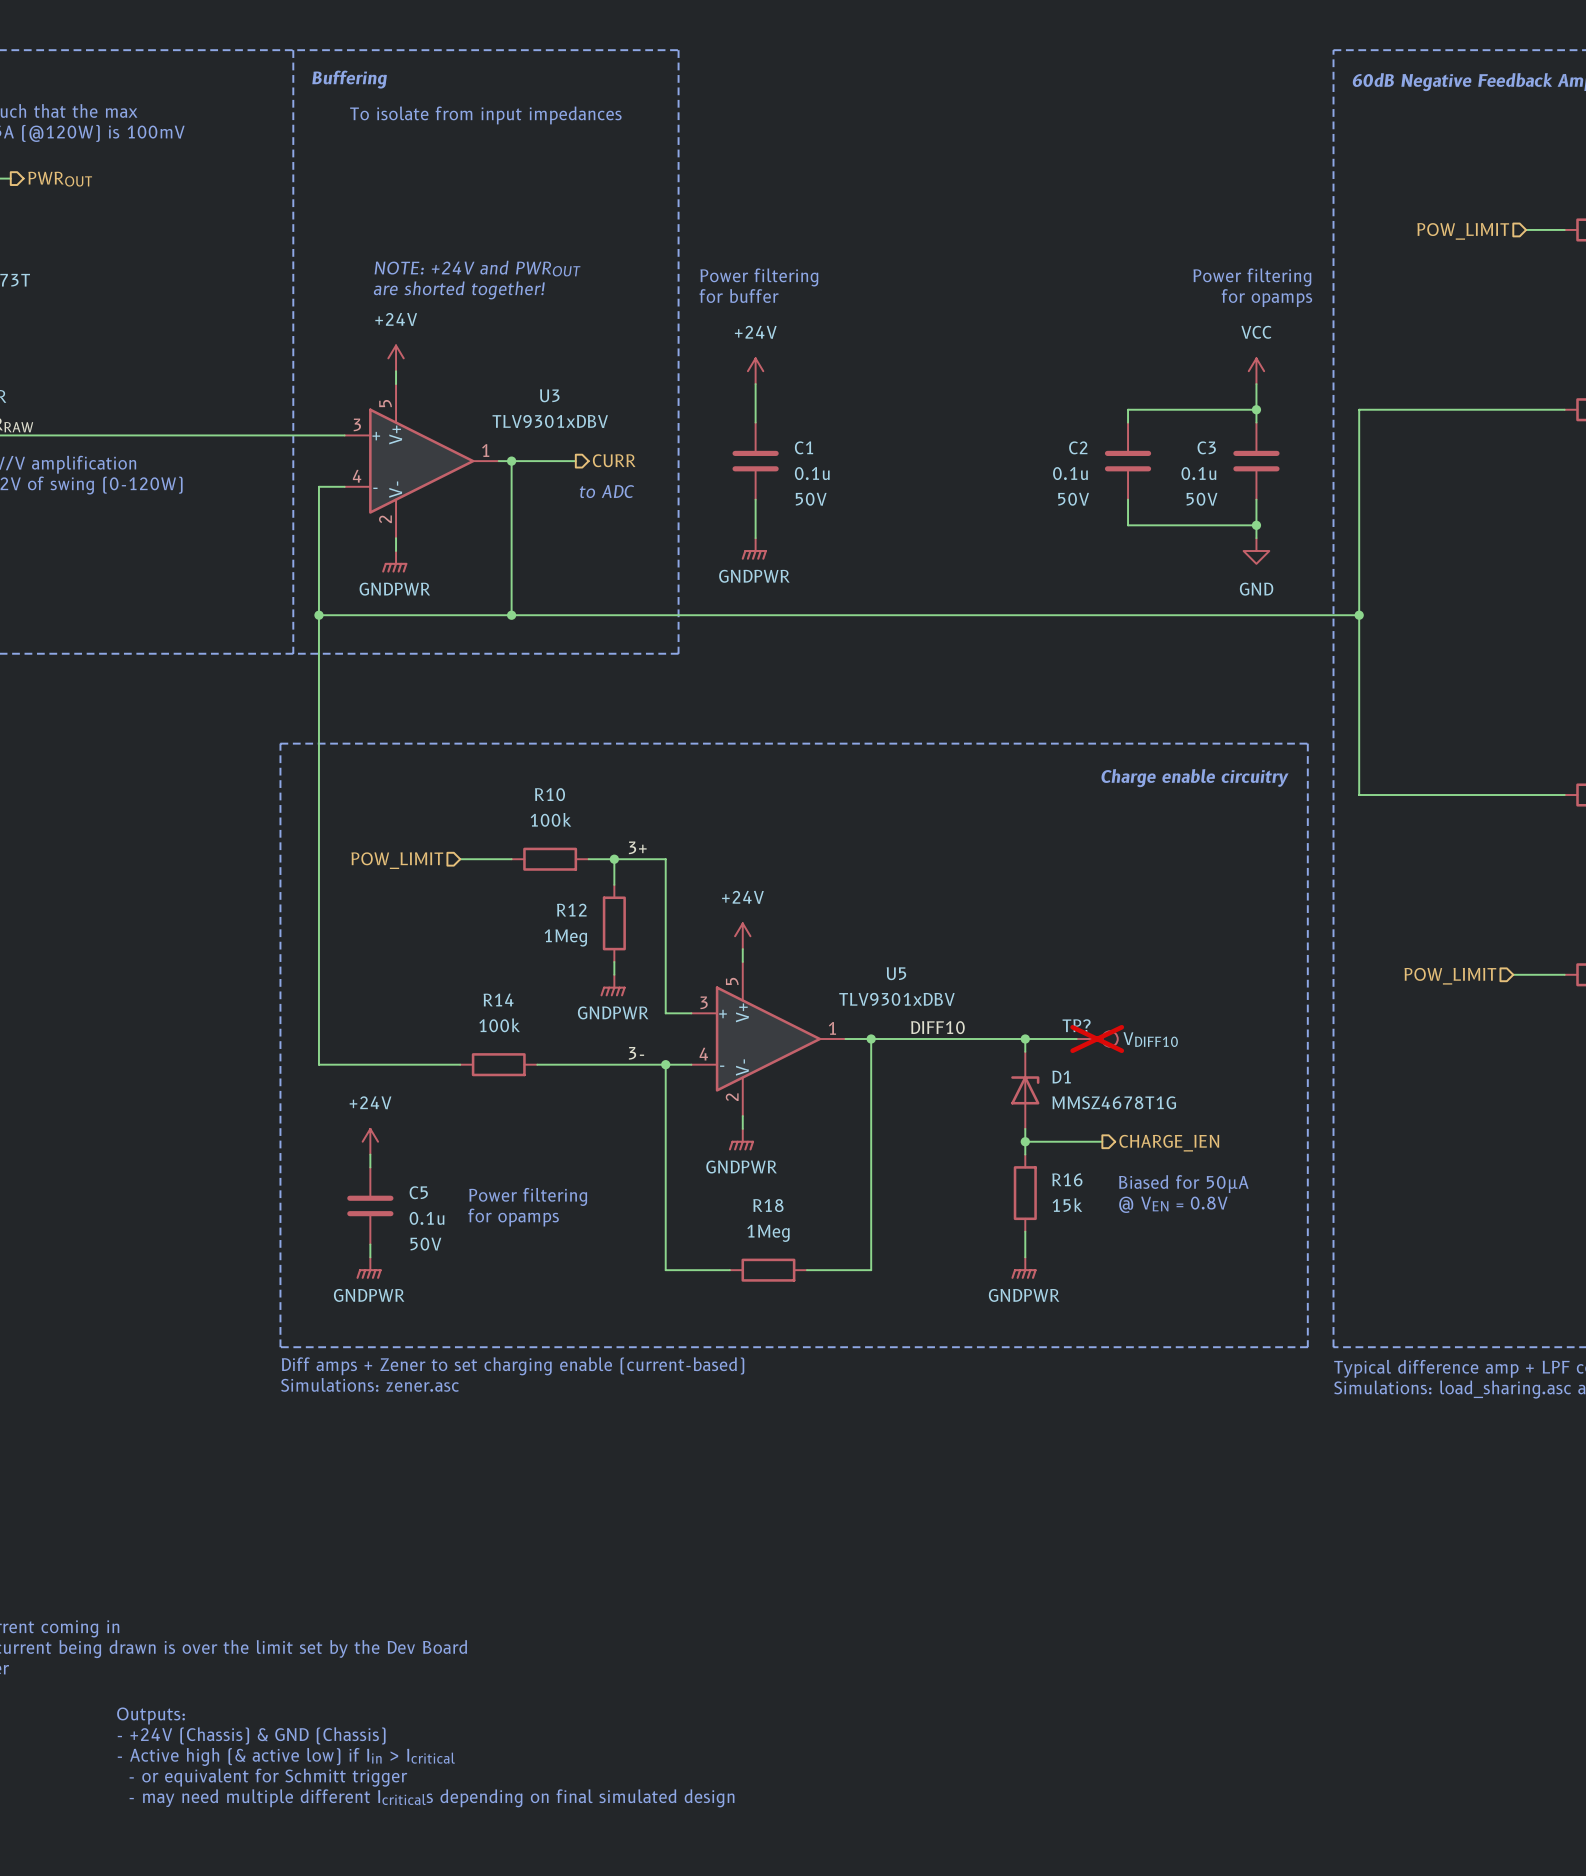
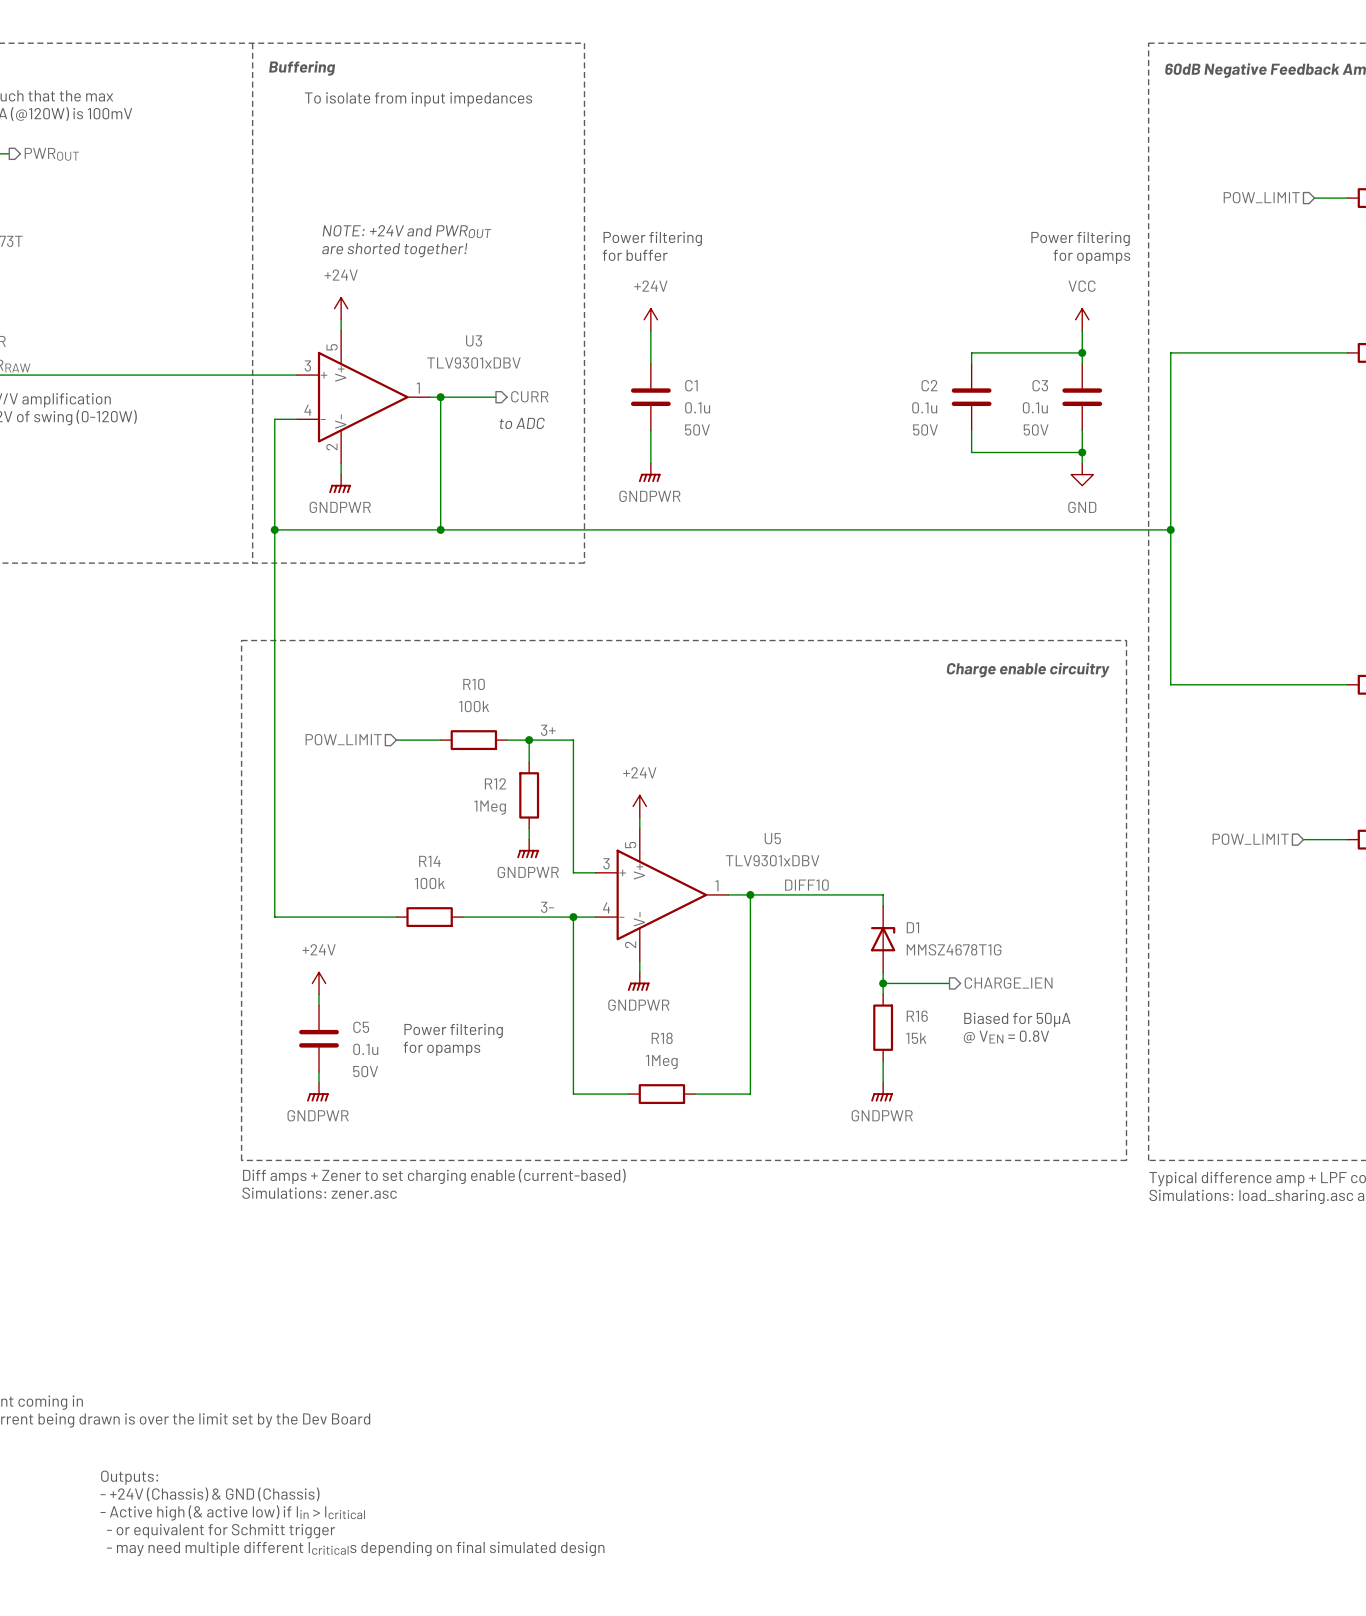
wire: (1025, 1039) (1076, 1039) -> none
junction: (1025, 1039) -> none
TP?: VDIFF10 (1097, 1039) -> none

